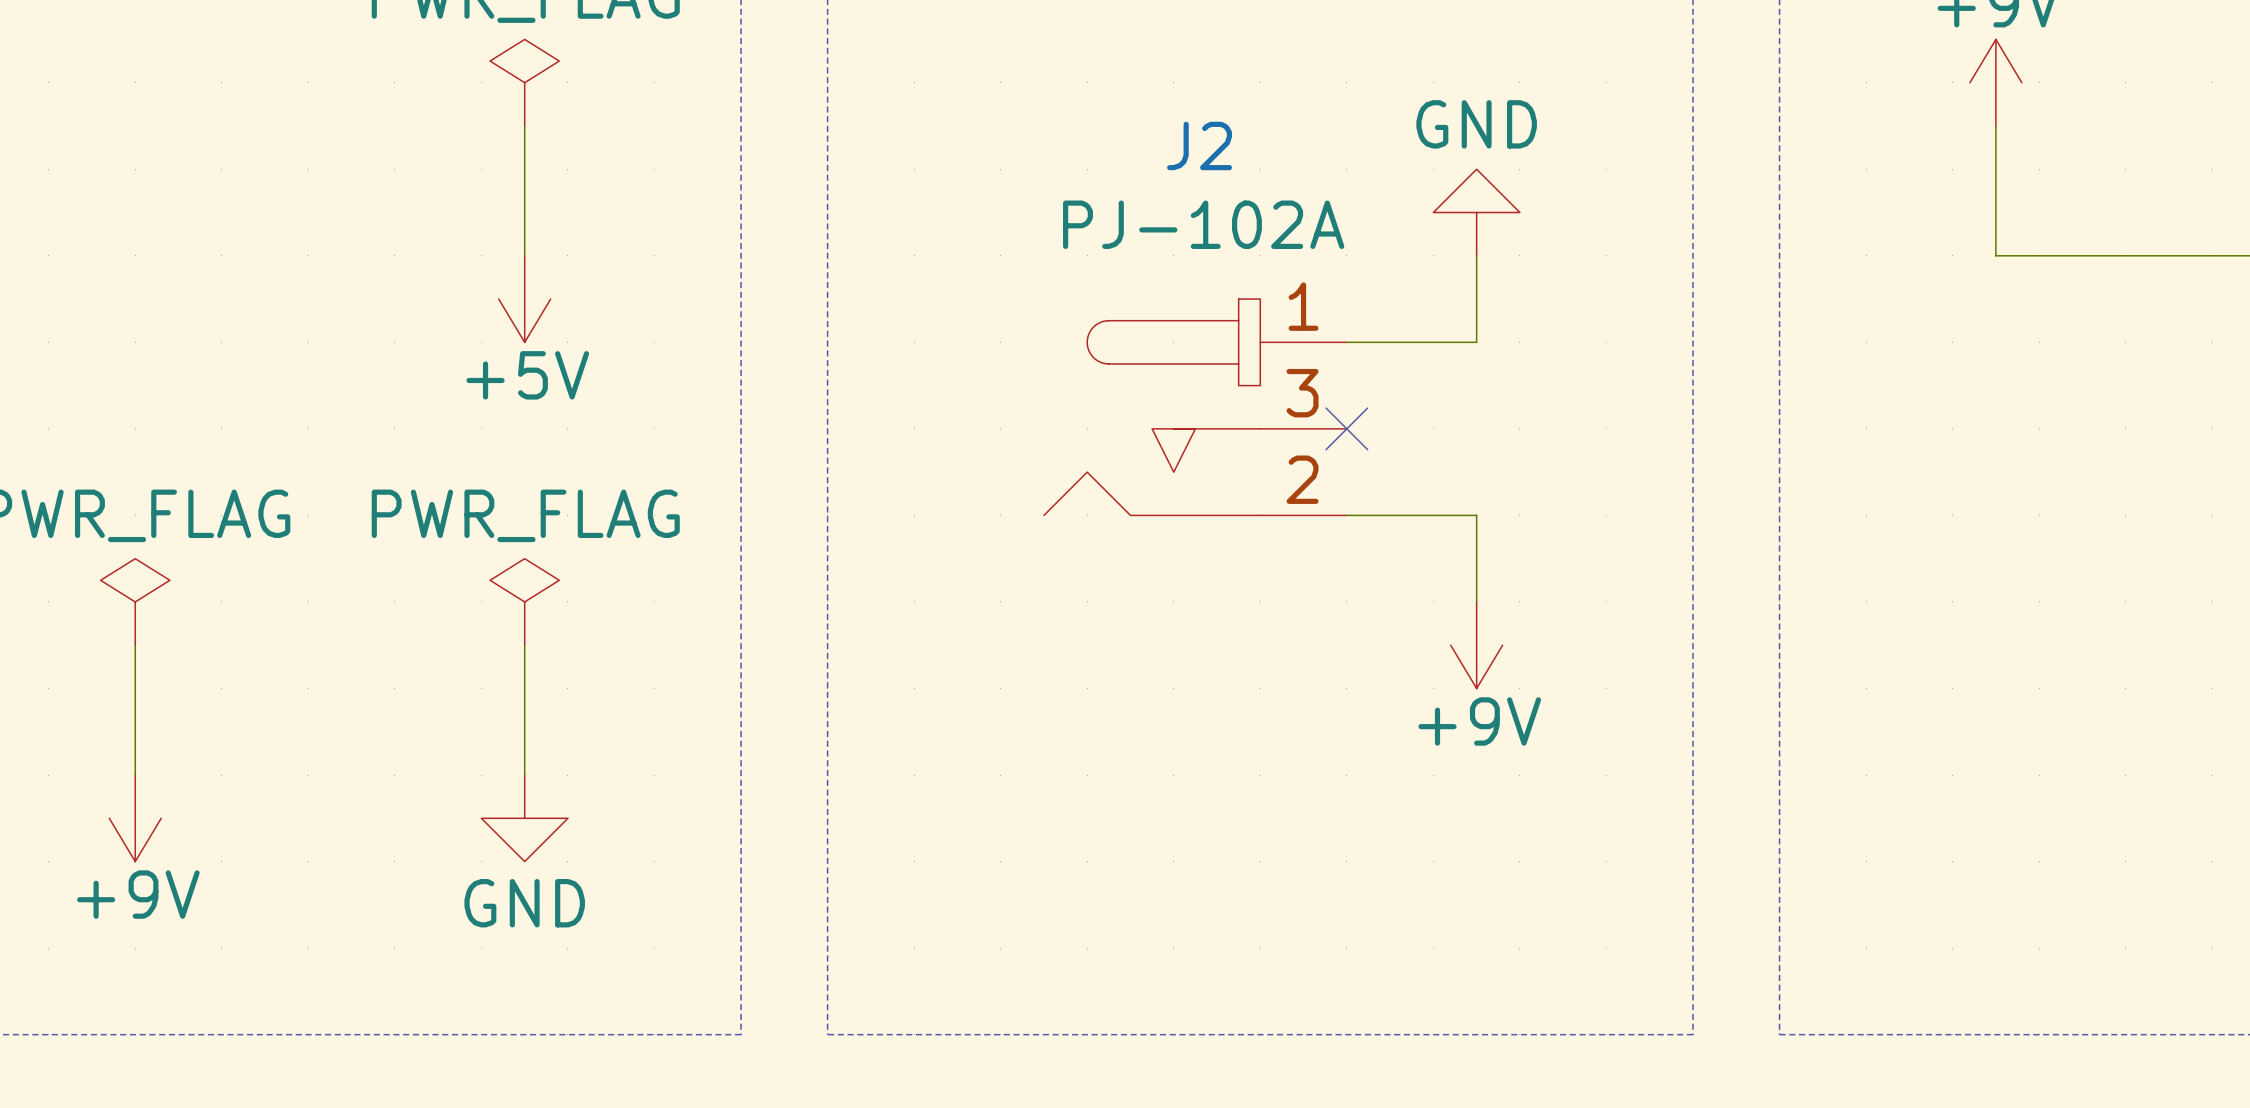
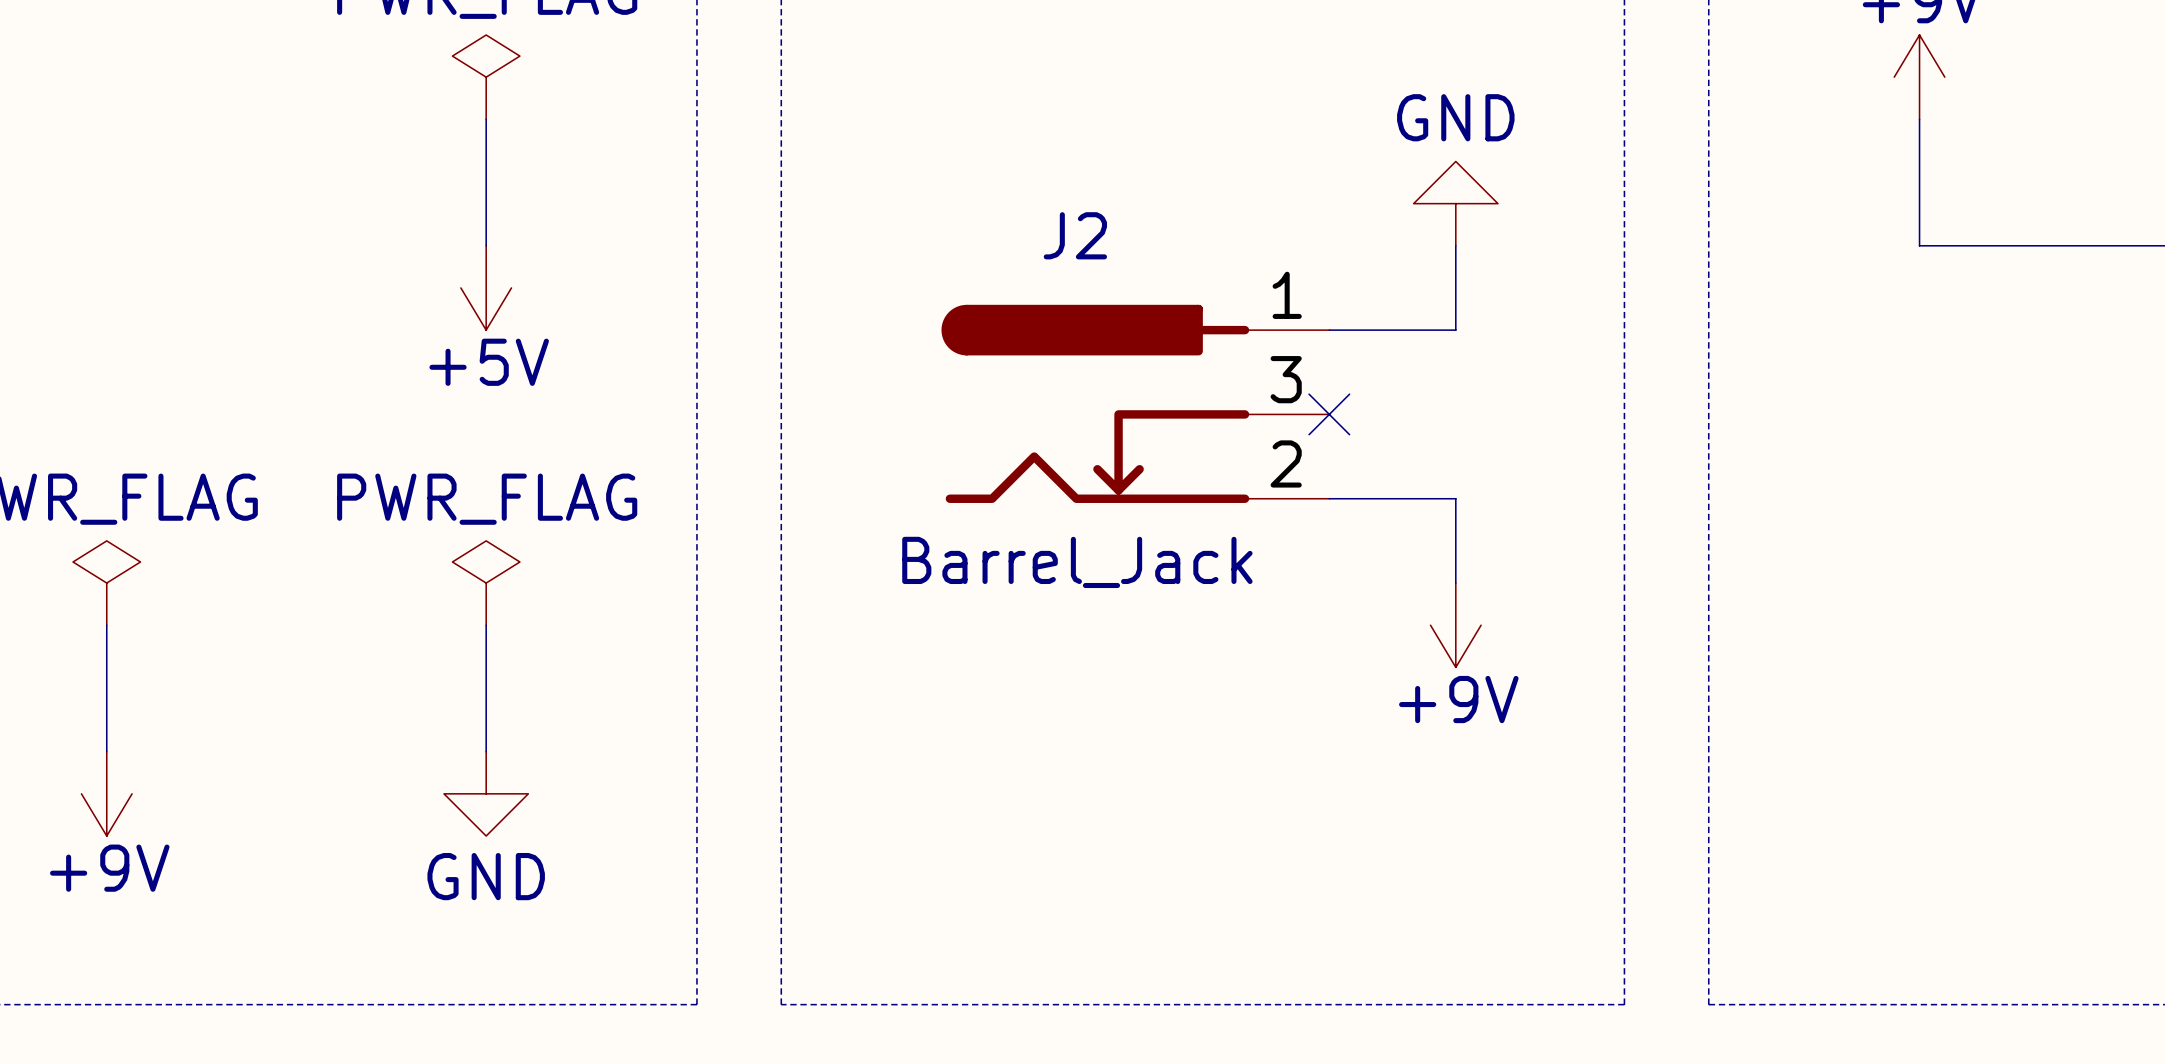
J2 name position: J2 (1199, 145) -> J2 (1075, 235)
power symbol position: GND (1476, 212) -> GND (1455, 203)
J2 value: PJ-102A (1203, 224) -> Barrel_Jack (1077, 562)
wire: (1476, 255) (1476, 342) -> (1455, 245) (1455, 330) (1413, 330)
J2 symbol: [1043, 299, 1347, 516] -> [941, 304, 1330, 503]
no-connect mark position: (1346, 428) -> (1329, 414)
wire: (1476, 515) (1476, 601) -> (1413, 498) (1455, 498) (1455, 583)
power symbol position: +9V (1476, 645) -> +9V (1455, 625)

